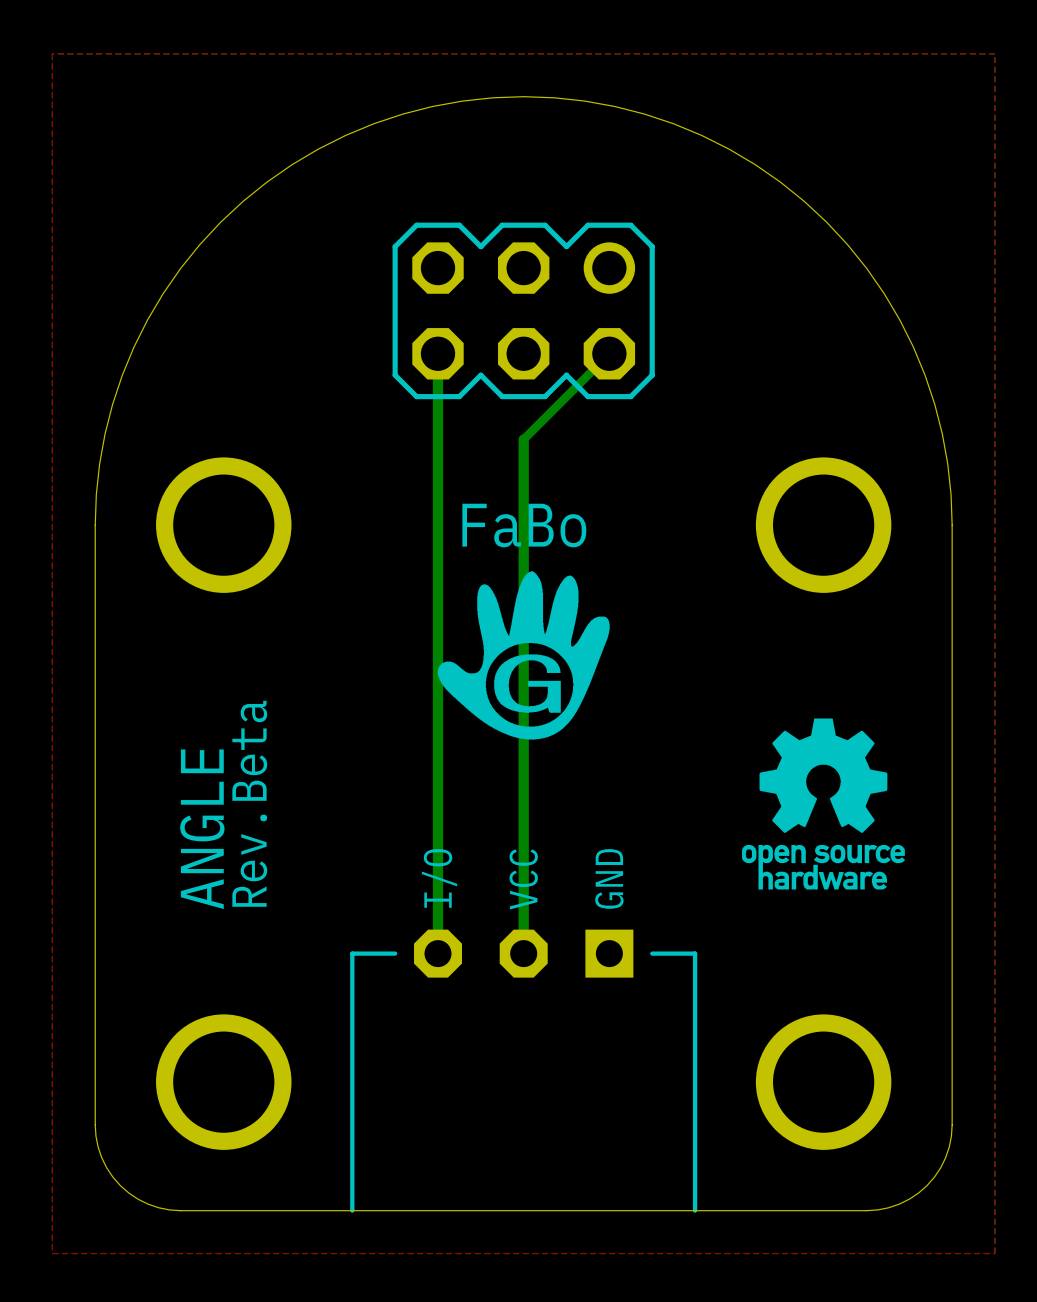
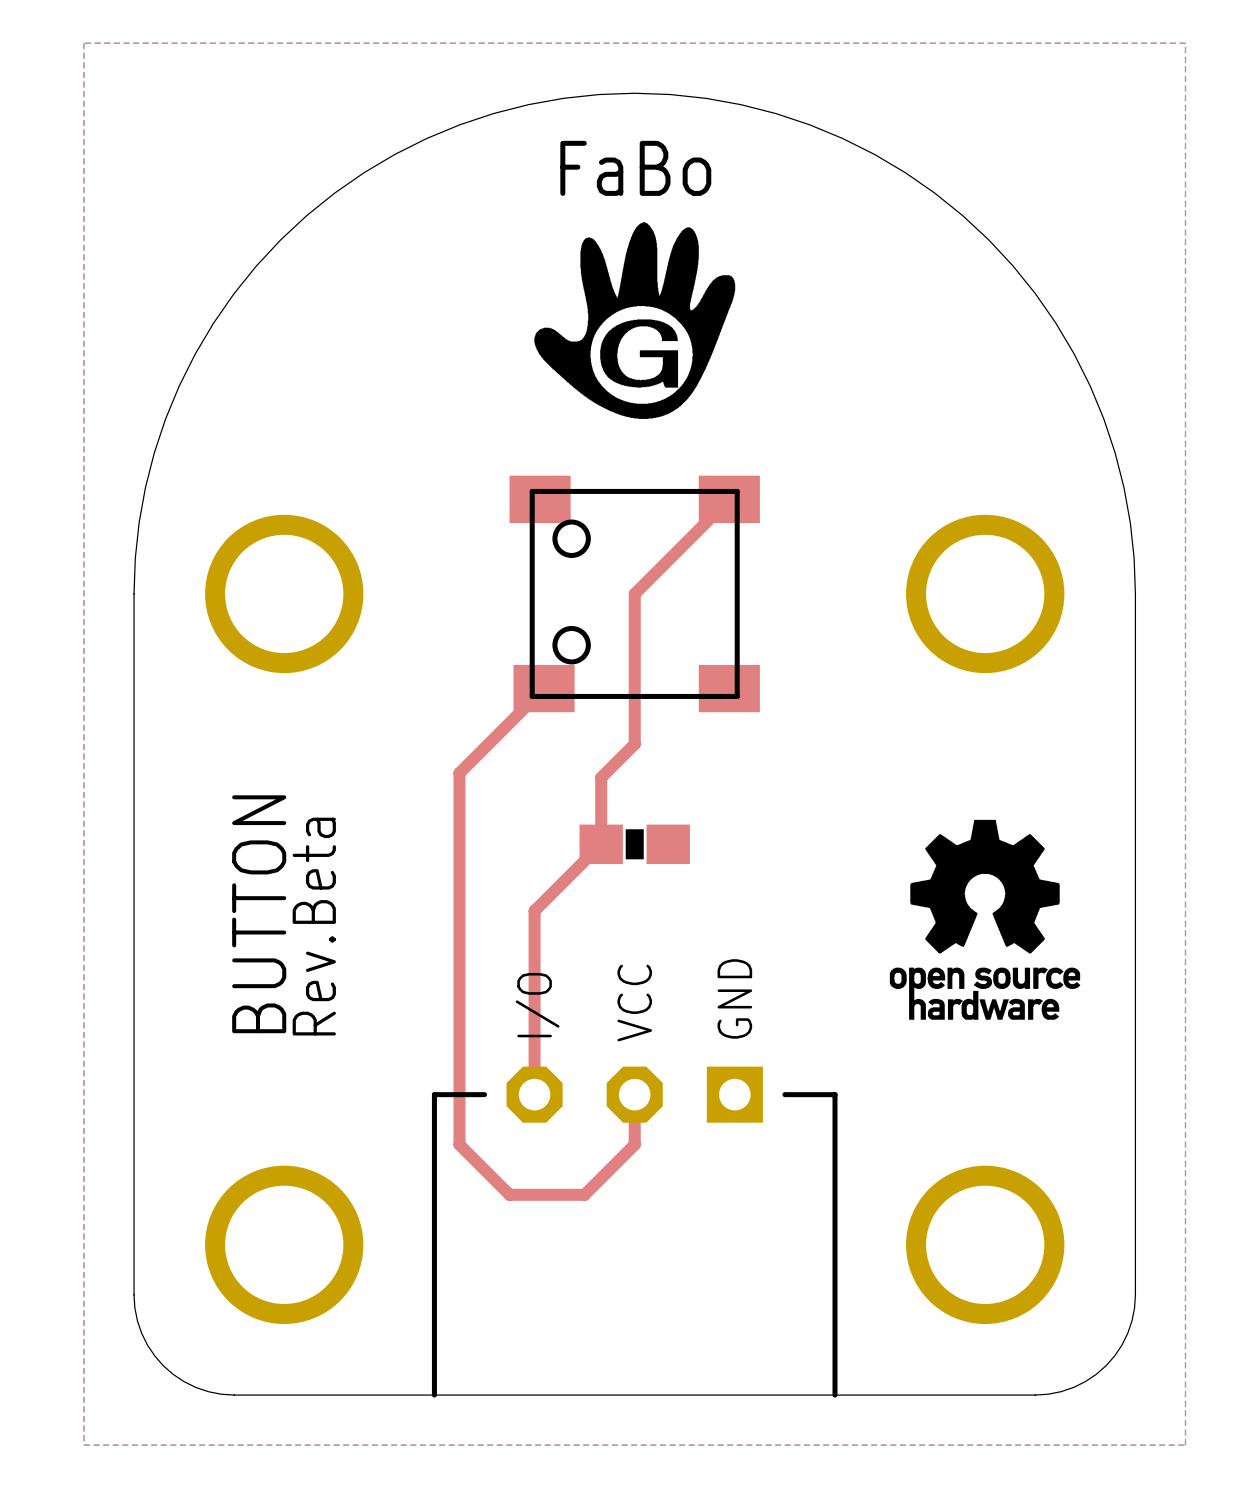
part: (523, 310) -> none
bottom track: (438, 353) (438, 953) -> none
bottom track: (609, 353) (523, 439) (523, 953) -> none
top track: none -> (729, 499) (634, 593) (634, 744) (601, 777) (601, 844) (534, 910) (534, 1094)
part: none -> (634, 593)
top track: none -> (544, 688) (459, 773) (459, 1144) (509, 1194) (584, 1194) (634, 1144) (634, 1094)
drawing position: (523, 655) -> (634, 320)
part: none -> (634, 844)
text: ANGLE (202, 829) -> BUTTON (259, 914)

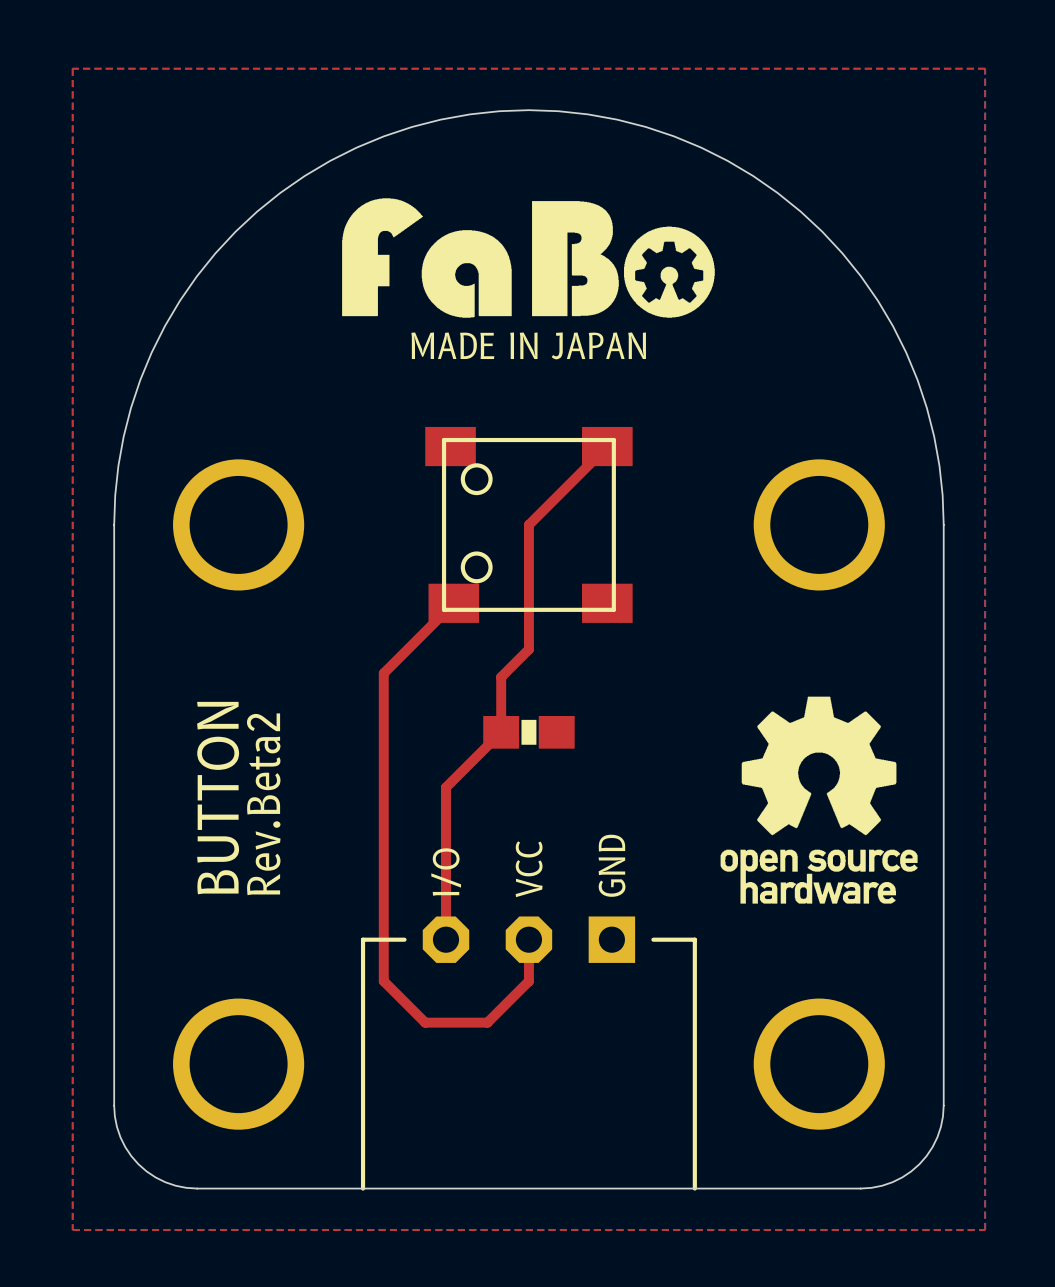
drawing: none -> [342, 198, 715, 318]
drawing: [534, 222, 736, 419] -> none
text: none -> MADE IN JAPAN (528, 345)
drawing shape: [889, 819, 1081, 1020] -> [720, 696, 918, 904]
text: Rev.Beta (314, 926) -> Rev.Beta2 (263, 804)

